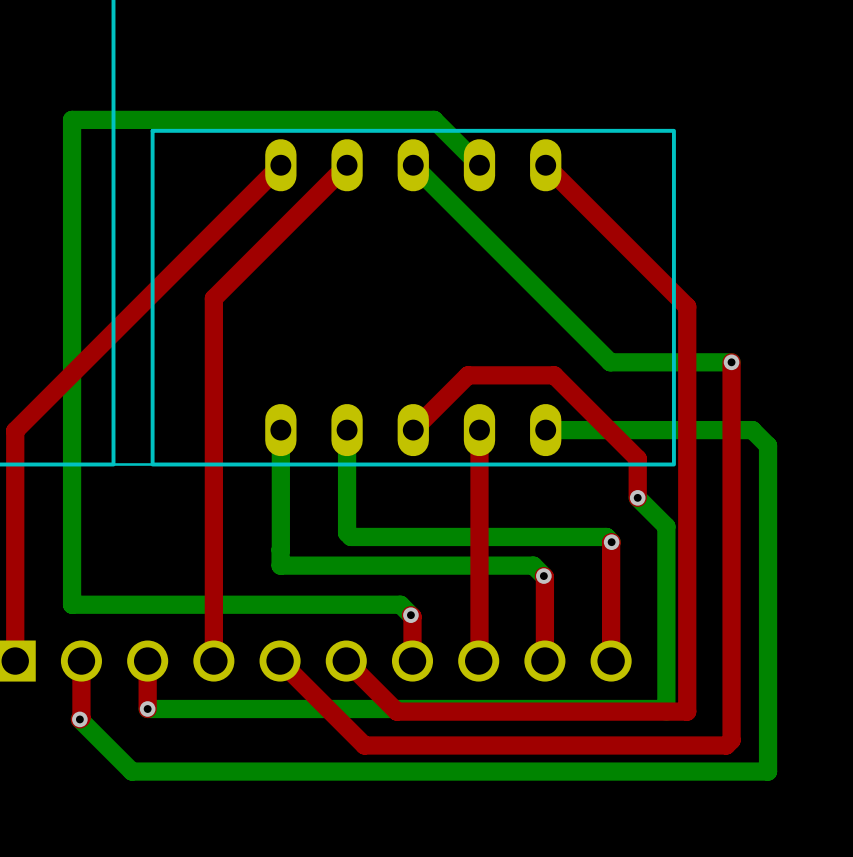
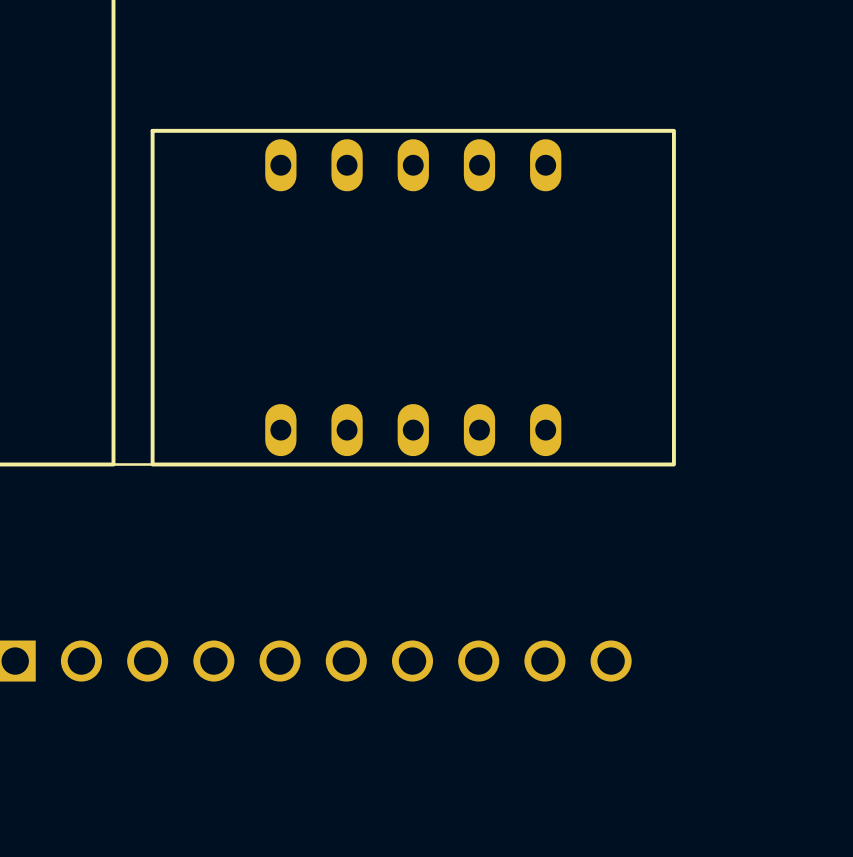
top track: (280, 165) (15, 430) (15, 661) -> none
top track: (347, 165) (213, 298) (213, 661) -> none
bottom track: (413, 165) (610, 362) (731, 362) -> none
bottom track: (479, 165) (434, 119) (72, 119) (72, 604) (400, 604) (410, 615) -> none
top track: (545, 165) (687, 306) (687, 711) (396, 711) (346, 661) -> none
top track: (731, 362) (731, 740) (726, 745) (364, 745) (280, 661) -> none
via: (731, 362) -> none
bottom track: (280, 430) (280, 549) -> none
bottom track: (347, 430) (347, 533) (350, 536) (606, 536) (611, 542) -> none
top track: (413, 430) (468, 375) (554, 375) (637, 458) (637, 497) -> none
top track: (479, 430) (478, 661) -> none
bottom track: (545, 430) (752, 430) (768, 445) (768, 771) (132, 771) (79, 719) -> none
bottom track: (637, 497) (666, 526) (666, 711) -> none
via: (637, 497) -> none
top track: (611, 542) (611, 661) -> none
via: (611, 542) -> none
bottom track: (280, 549) (280, 565) (533, 565) (543, 576) -> none
top track: (543, 576) (544, 661) -> none
via: (543, 576) -> none
top track: (410, 615) (412, 616) (412, 661) -> none
via: (410, 615) -> none
top track: (81, 661) (81, 717) (79, 719) -> none
top track: (147, 661) (147, 709) -> none
bottom track: (147, 709) (663, 709) -> none
via: (147, 709) -> none
via: (79, 719) -> none

